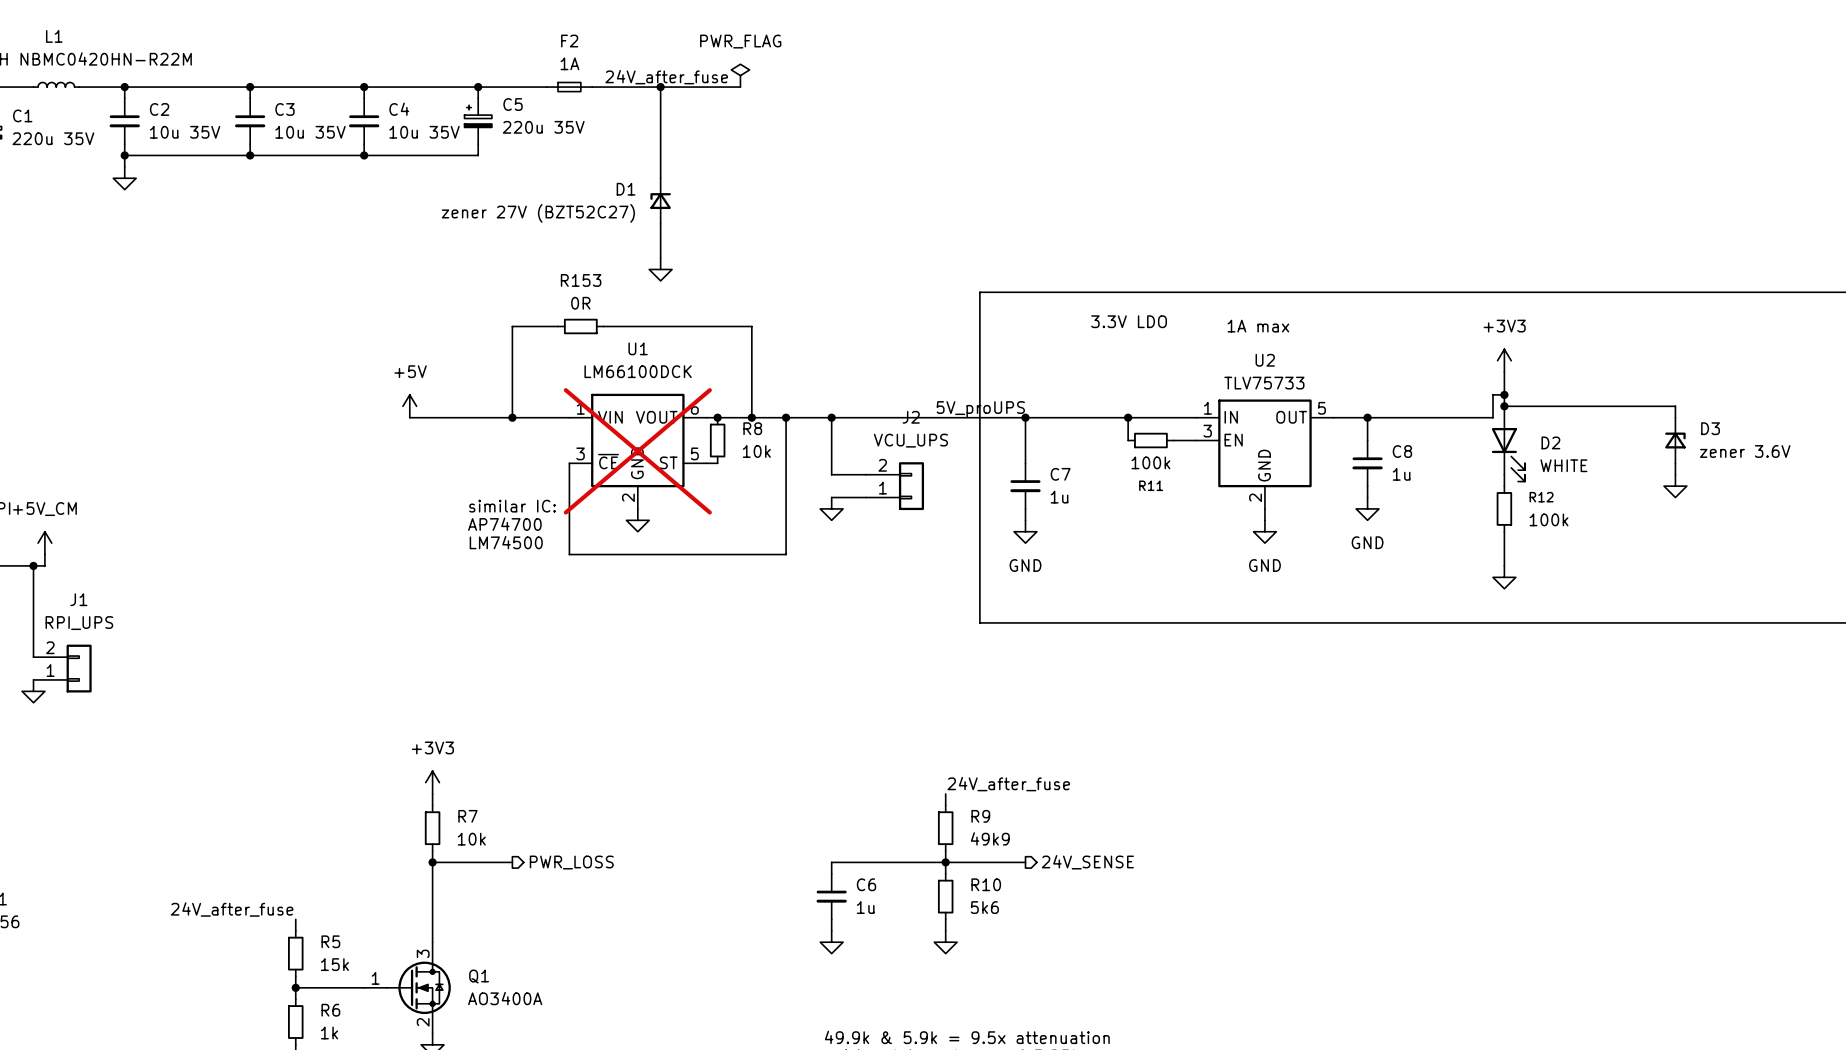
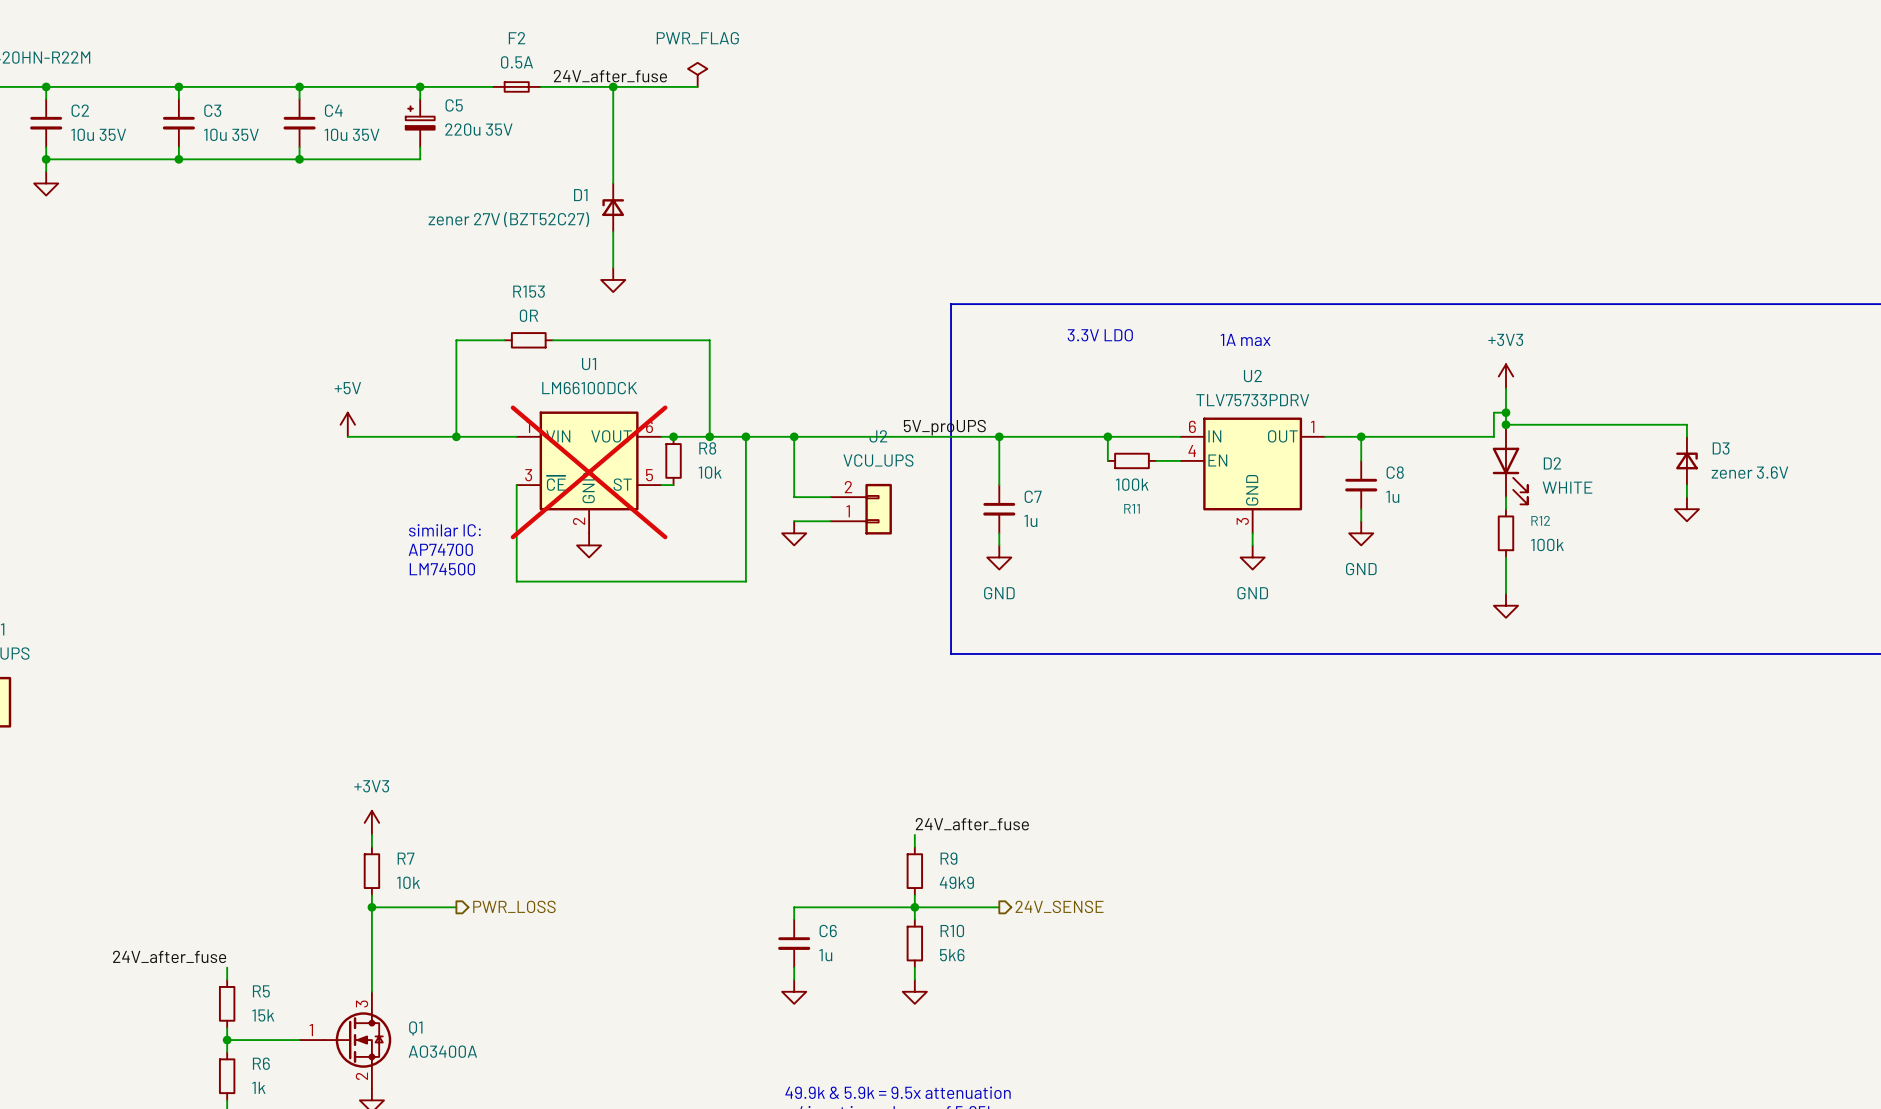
F2 value: 1A (569, 63) -> 0.5A (517, 62)
U2 value: TLV75733 (1264, 383) -> TLV75733PDRV (1252, 400)
U2 pin number: 1 (1207, 408) -> 6 (1192, 426)
U2 pin number: 5 (1321, 408) -> 1 (1312, 426)
U2 pin number: 3 (1207, 431) -> 4 (1192, 451)
U2 pin number: 2 (1255, 497) -> 3 (1242, 521)

